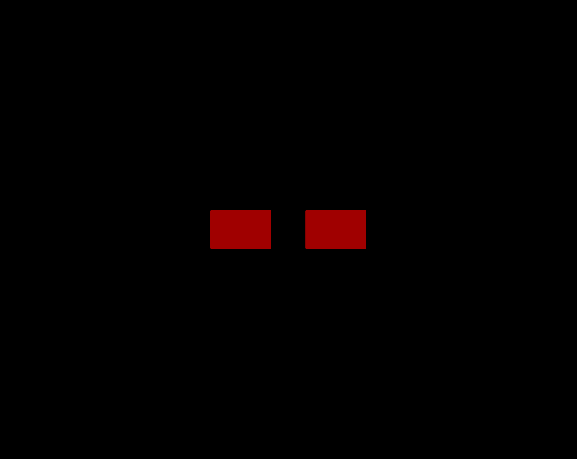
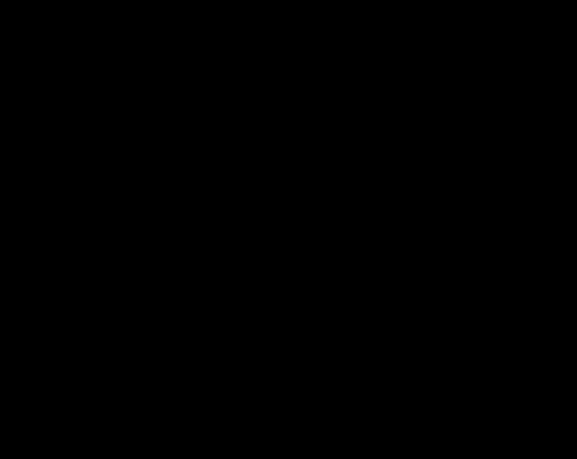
part: (288, 229) -> none

